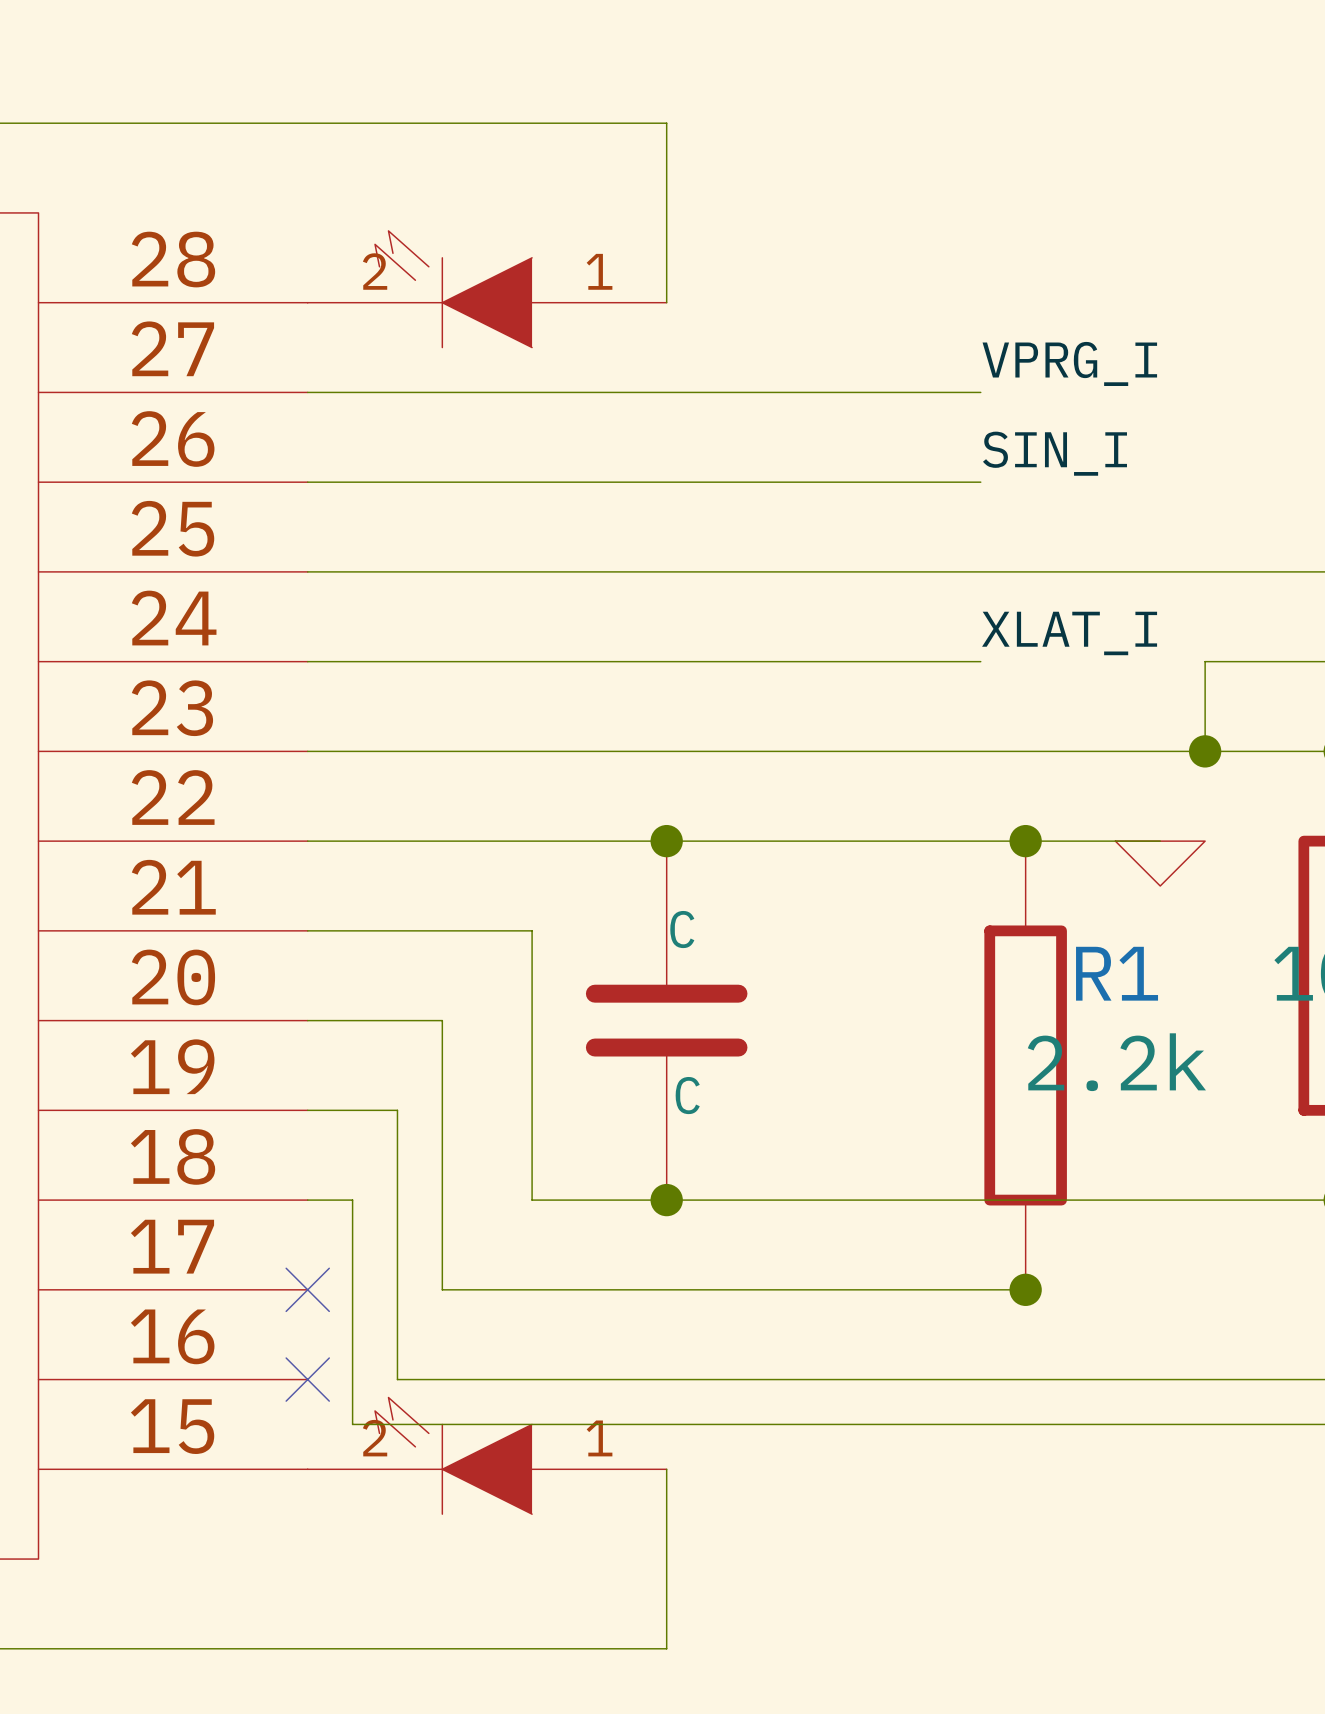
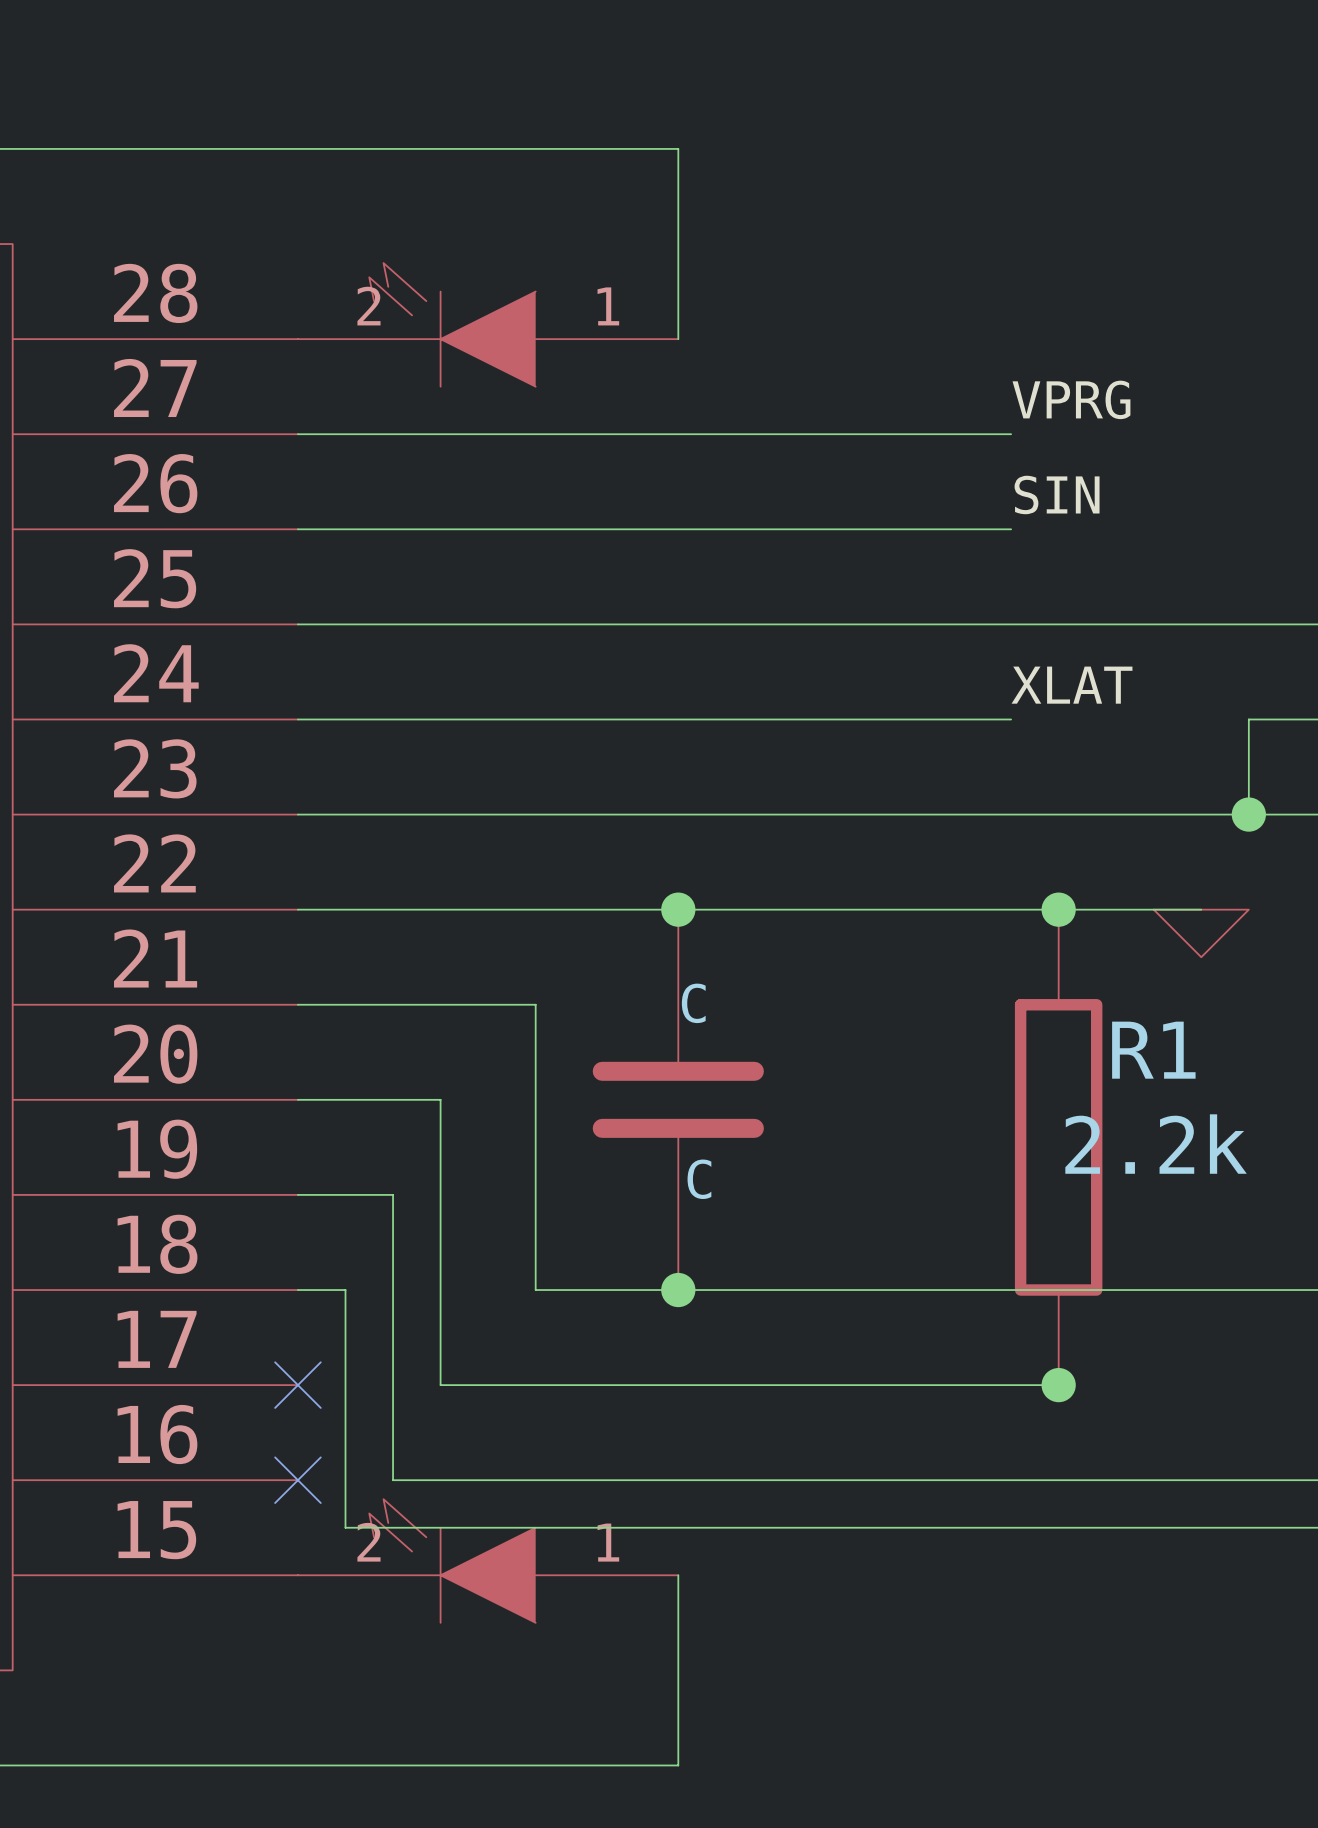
label: VPRG_I (1069, 363) -> VPRG (1071, 399)
label: SIN_I (1055, 453) -> SIN (1057, 494)
label: XLAT_I (1069, 633) -> XLAT (1072, 685)

